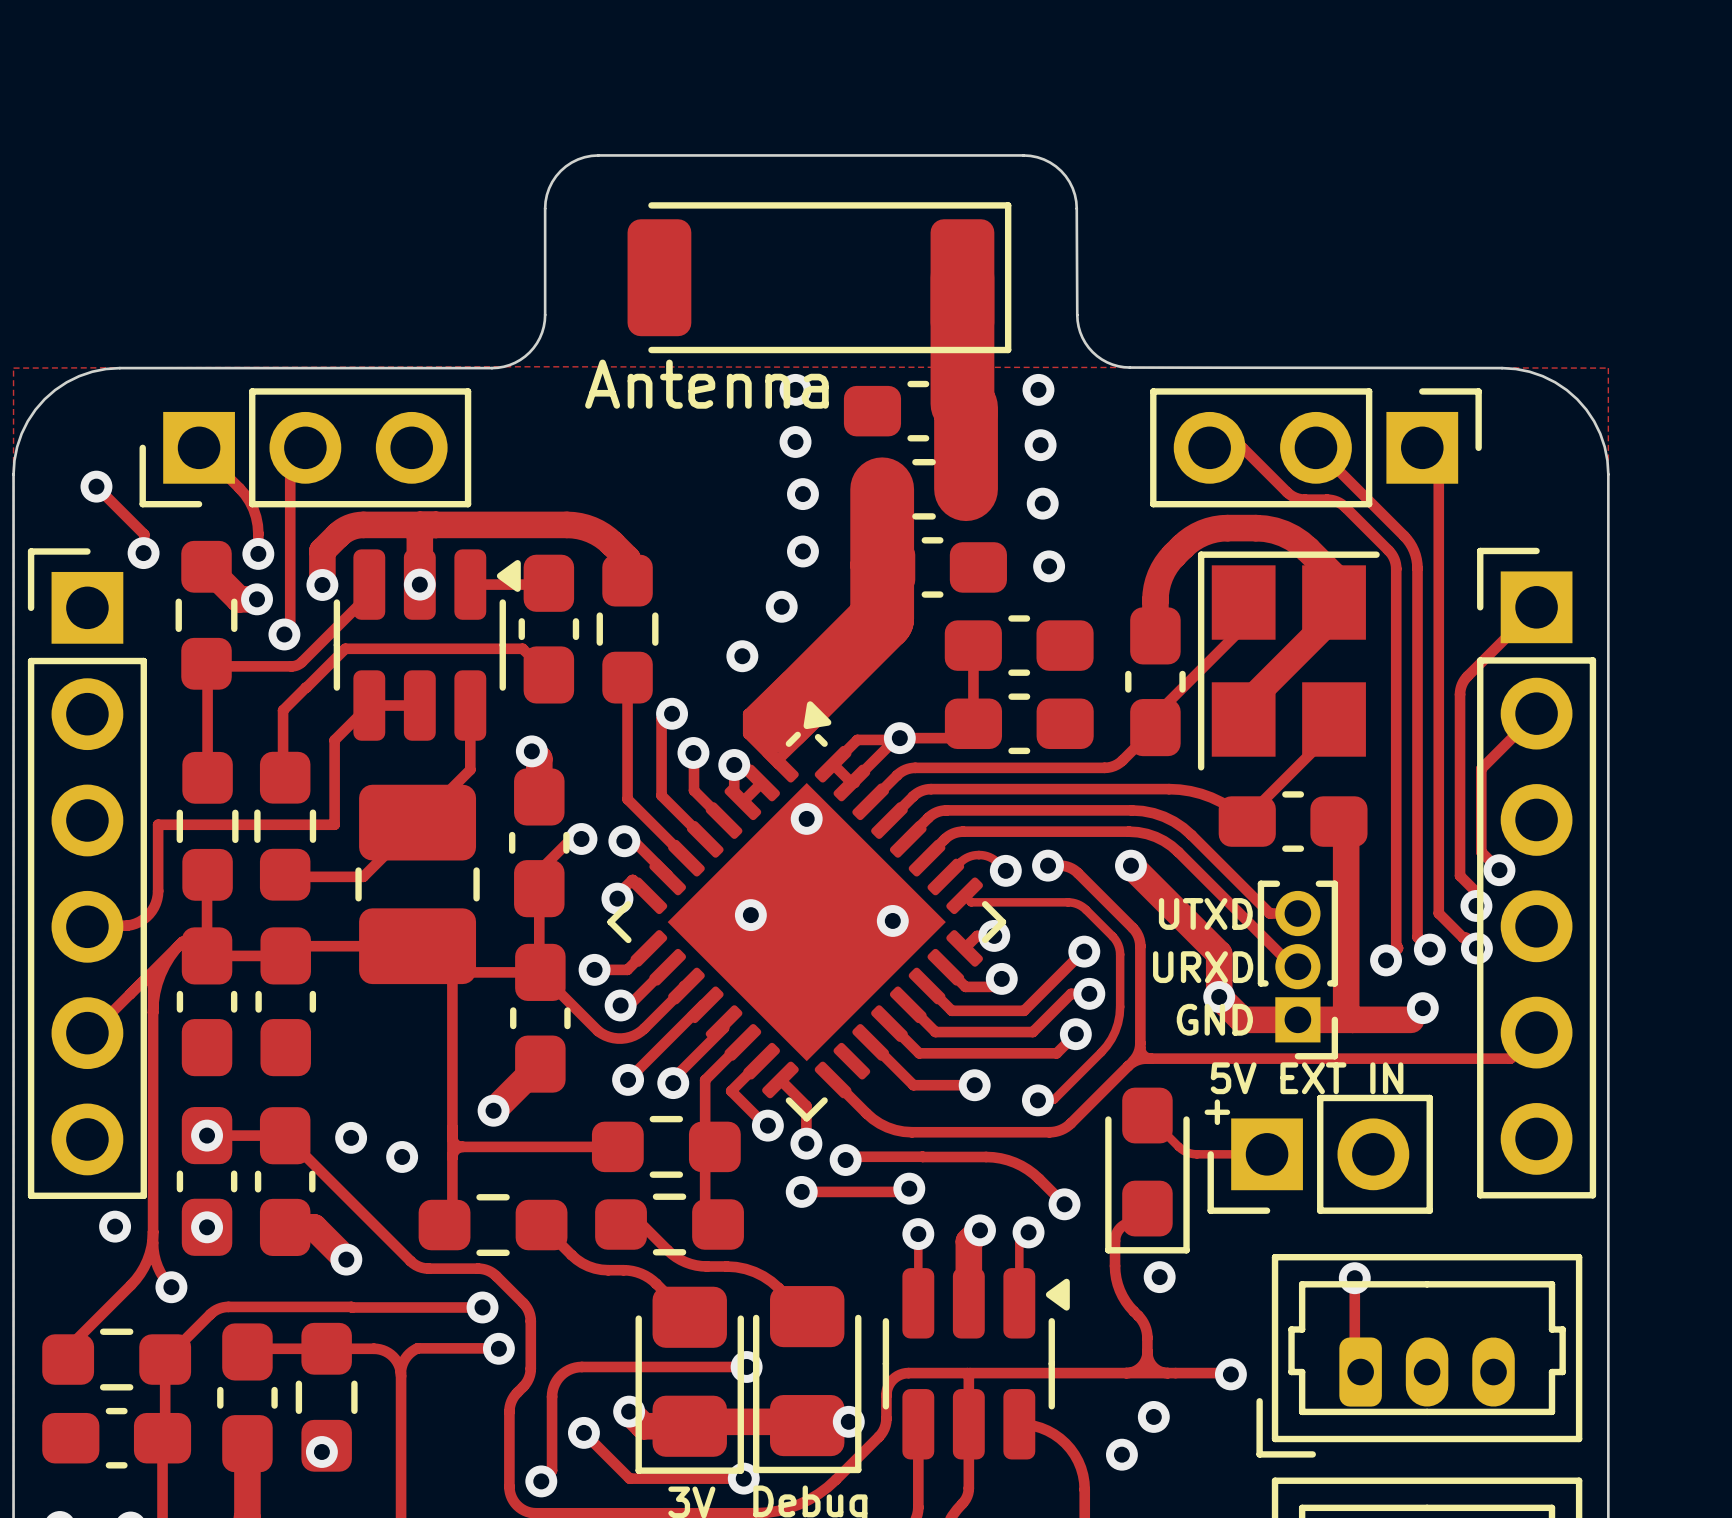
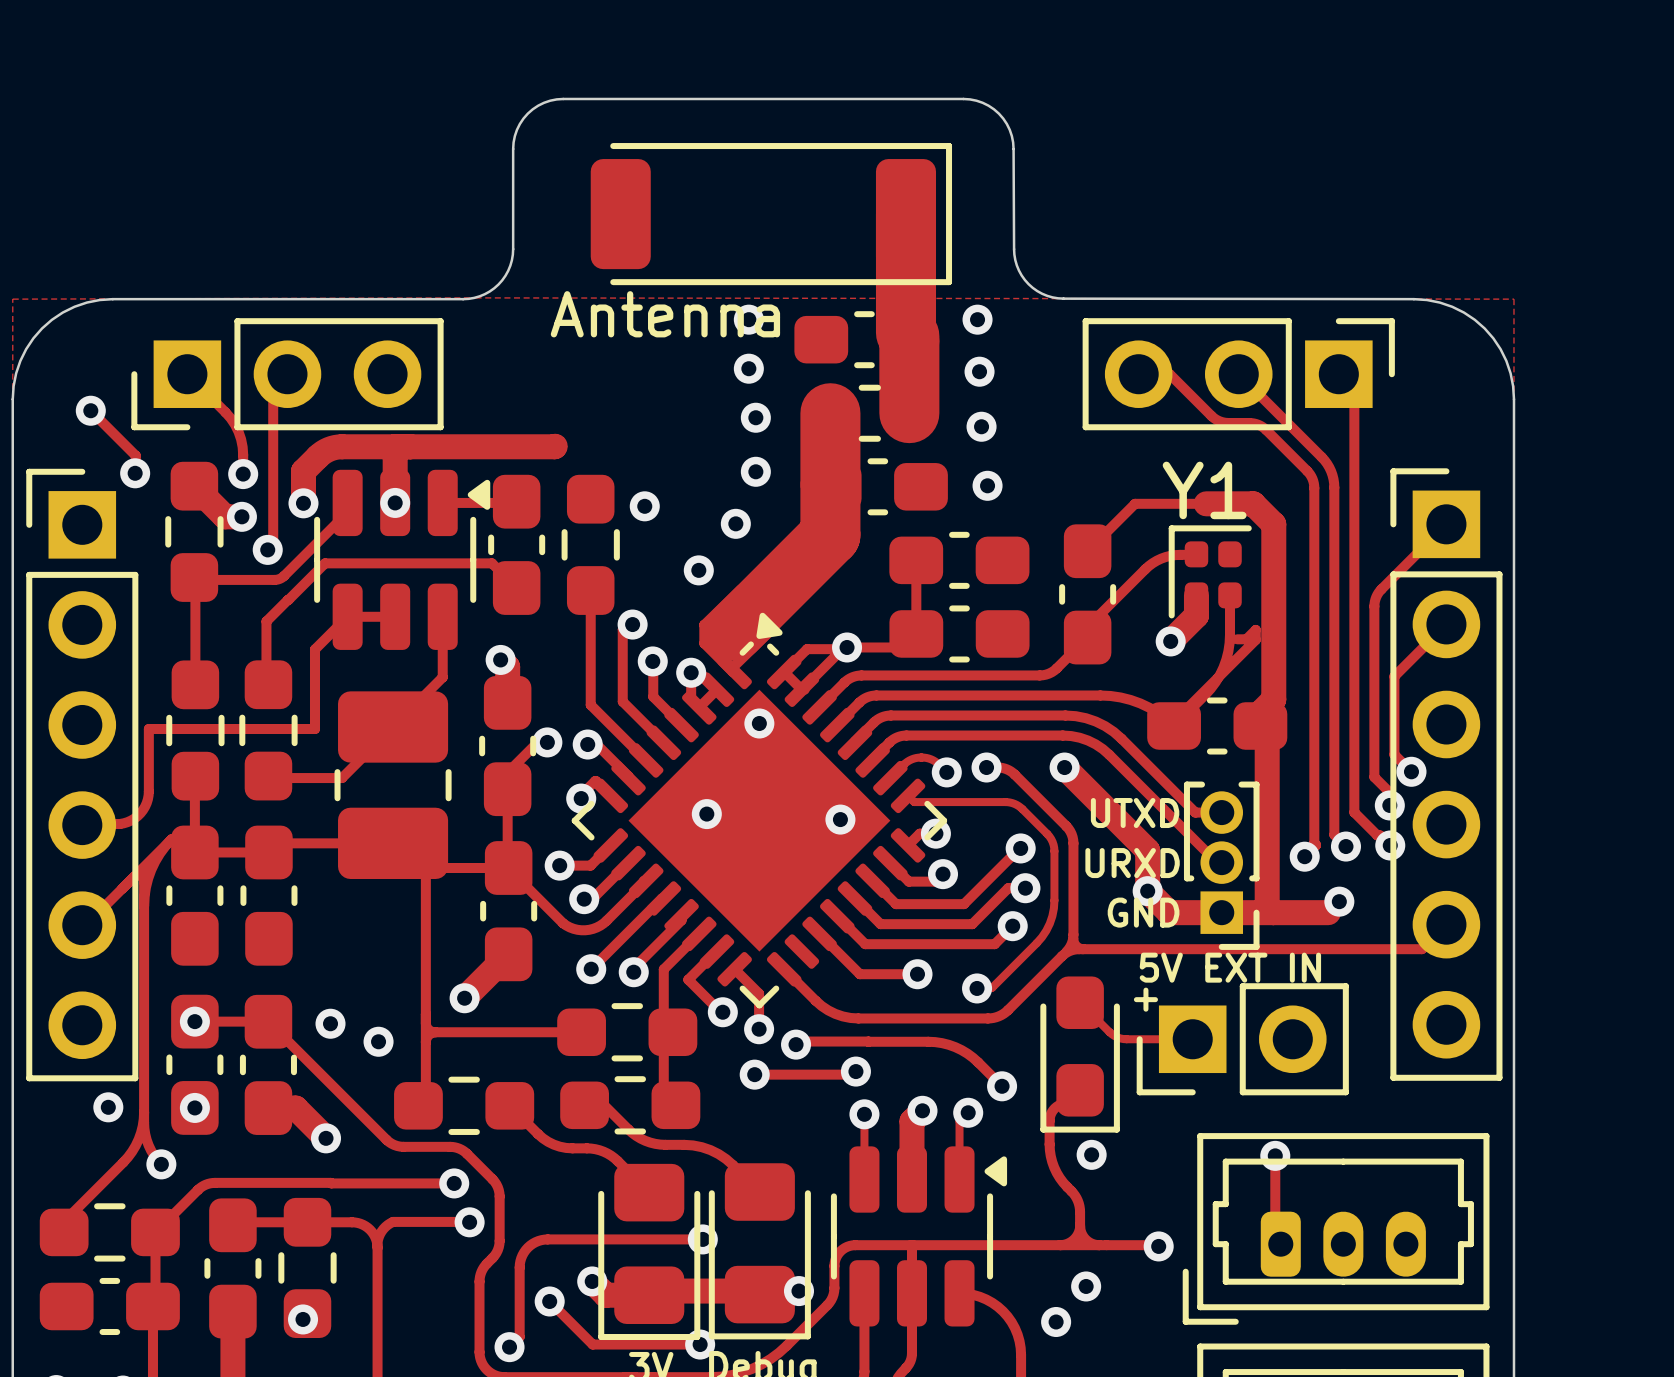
track: (566, 524) (591, 529) (612, 543) (627, 558) (627, 580) -> (533, 446) (554, 446)
via: none -> (644, 506)
track: (1243, 602) (1243, 626) (1155, 715) -> (1195, 554) (1170, 555) (1152, 563) (1087, 626)
track: (1334, 623) (1324, 623) (1245, 704) (1243, 704) (1243, 732) -> (1196, 595) (1196, 615) (1170, 641)
track: (1334, 623) (1334, 575) (1300, 543) (1283, 533) (1265, 528) (1221, 528) (1209, 530) (1192, 538) (1166, 564) (1156, 587) (1155, 635) -> (1260, 720) (1260, 726) (1260, 712) (1273, 699) (1273, 524) (1253, 503) (1135, 503) (1087, 551)
Y1: none -> (1210, 571)
part: (1288, 661) -> none
track: none -> (1230, 595) (1229, 643) (1223, 667) (1210, 688) (1174, 726)
via: none -> (1170, 641)

